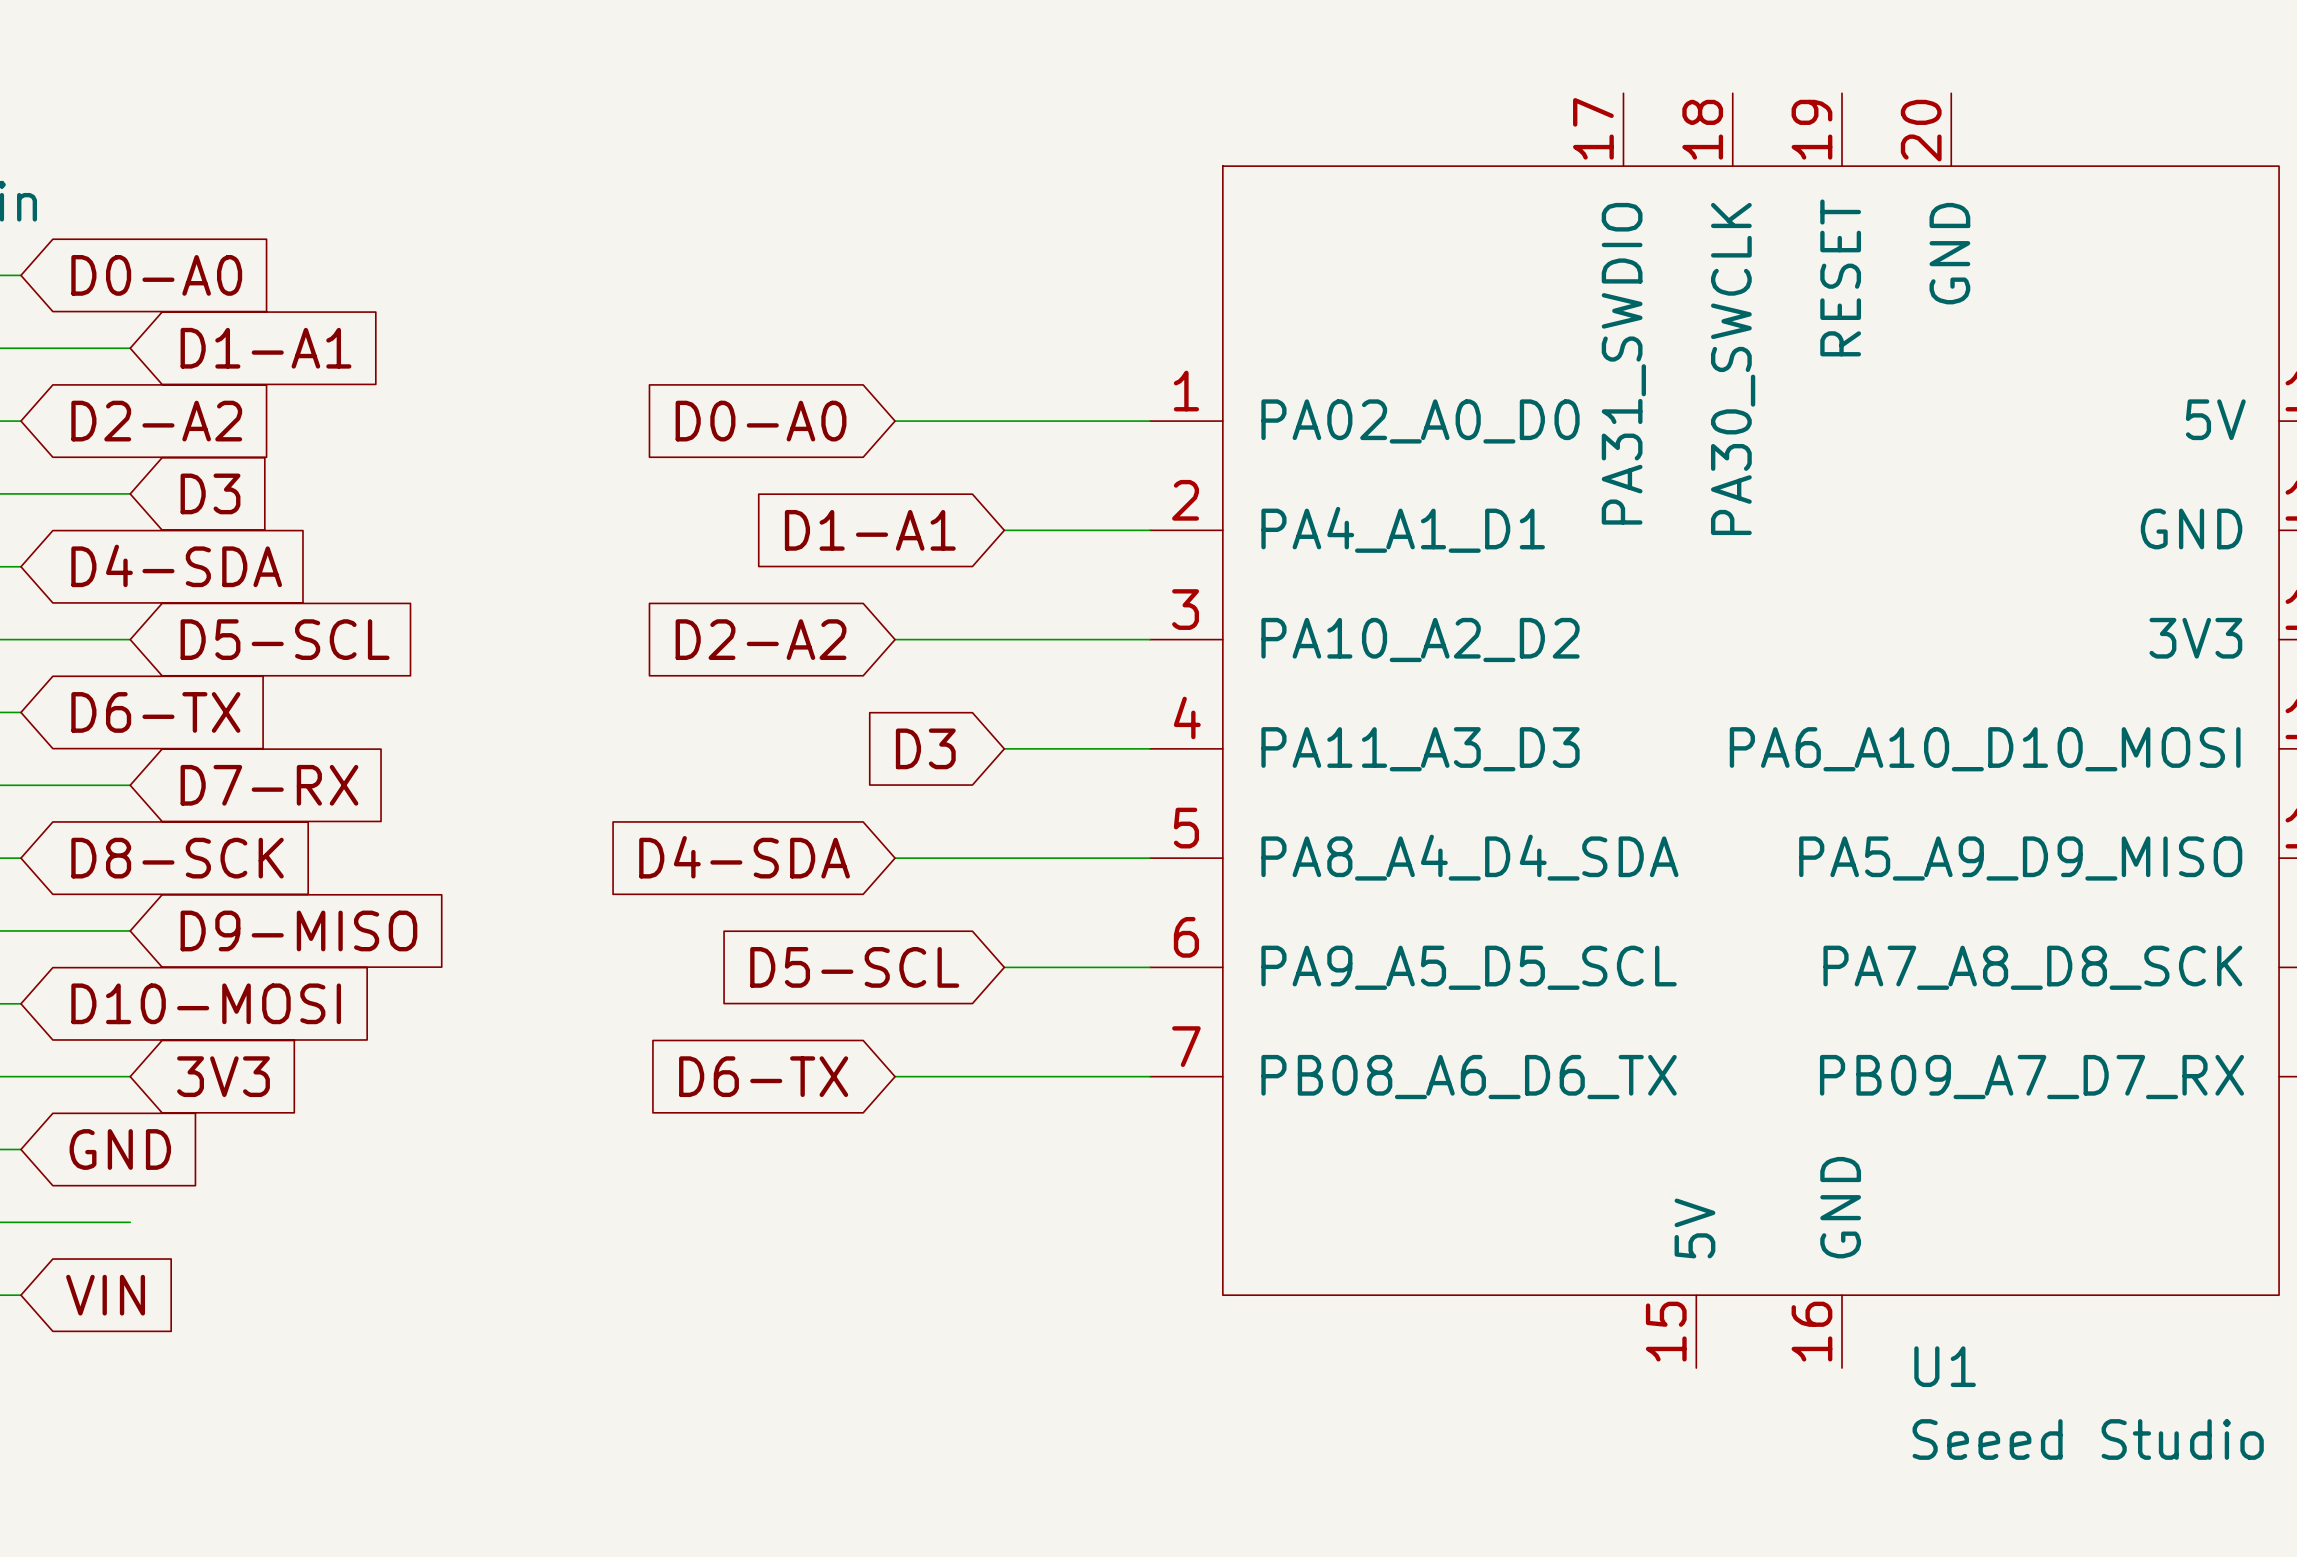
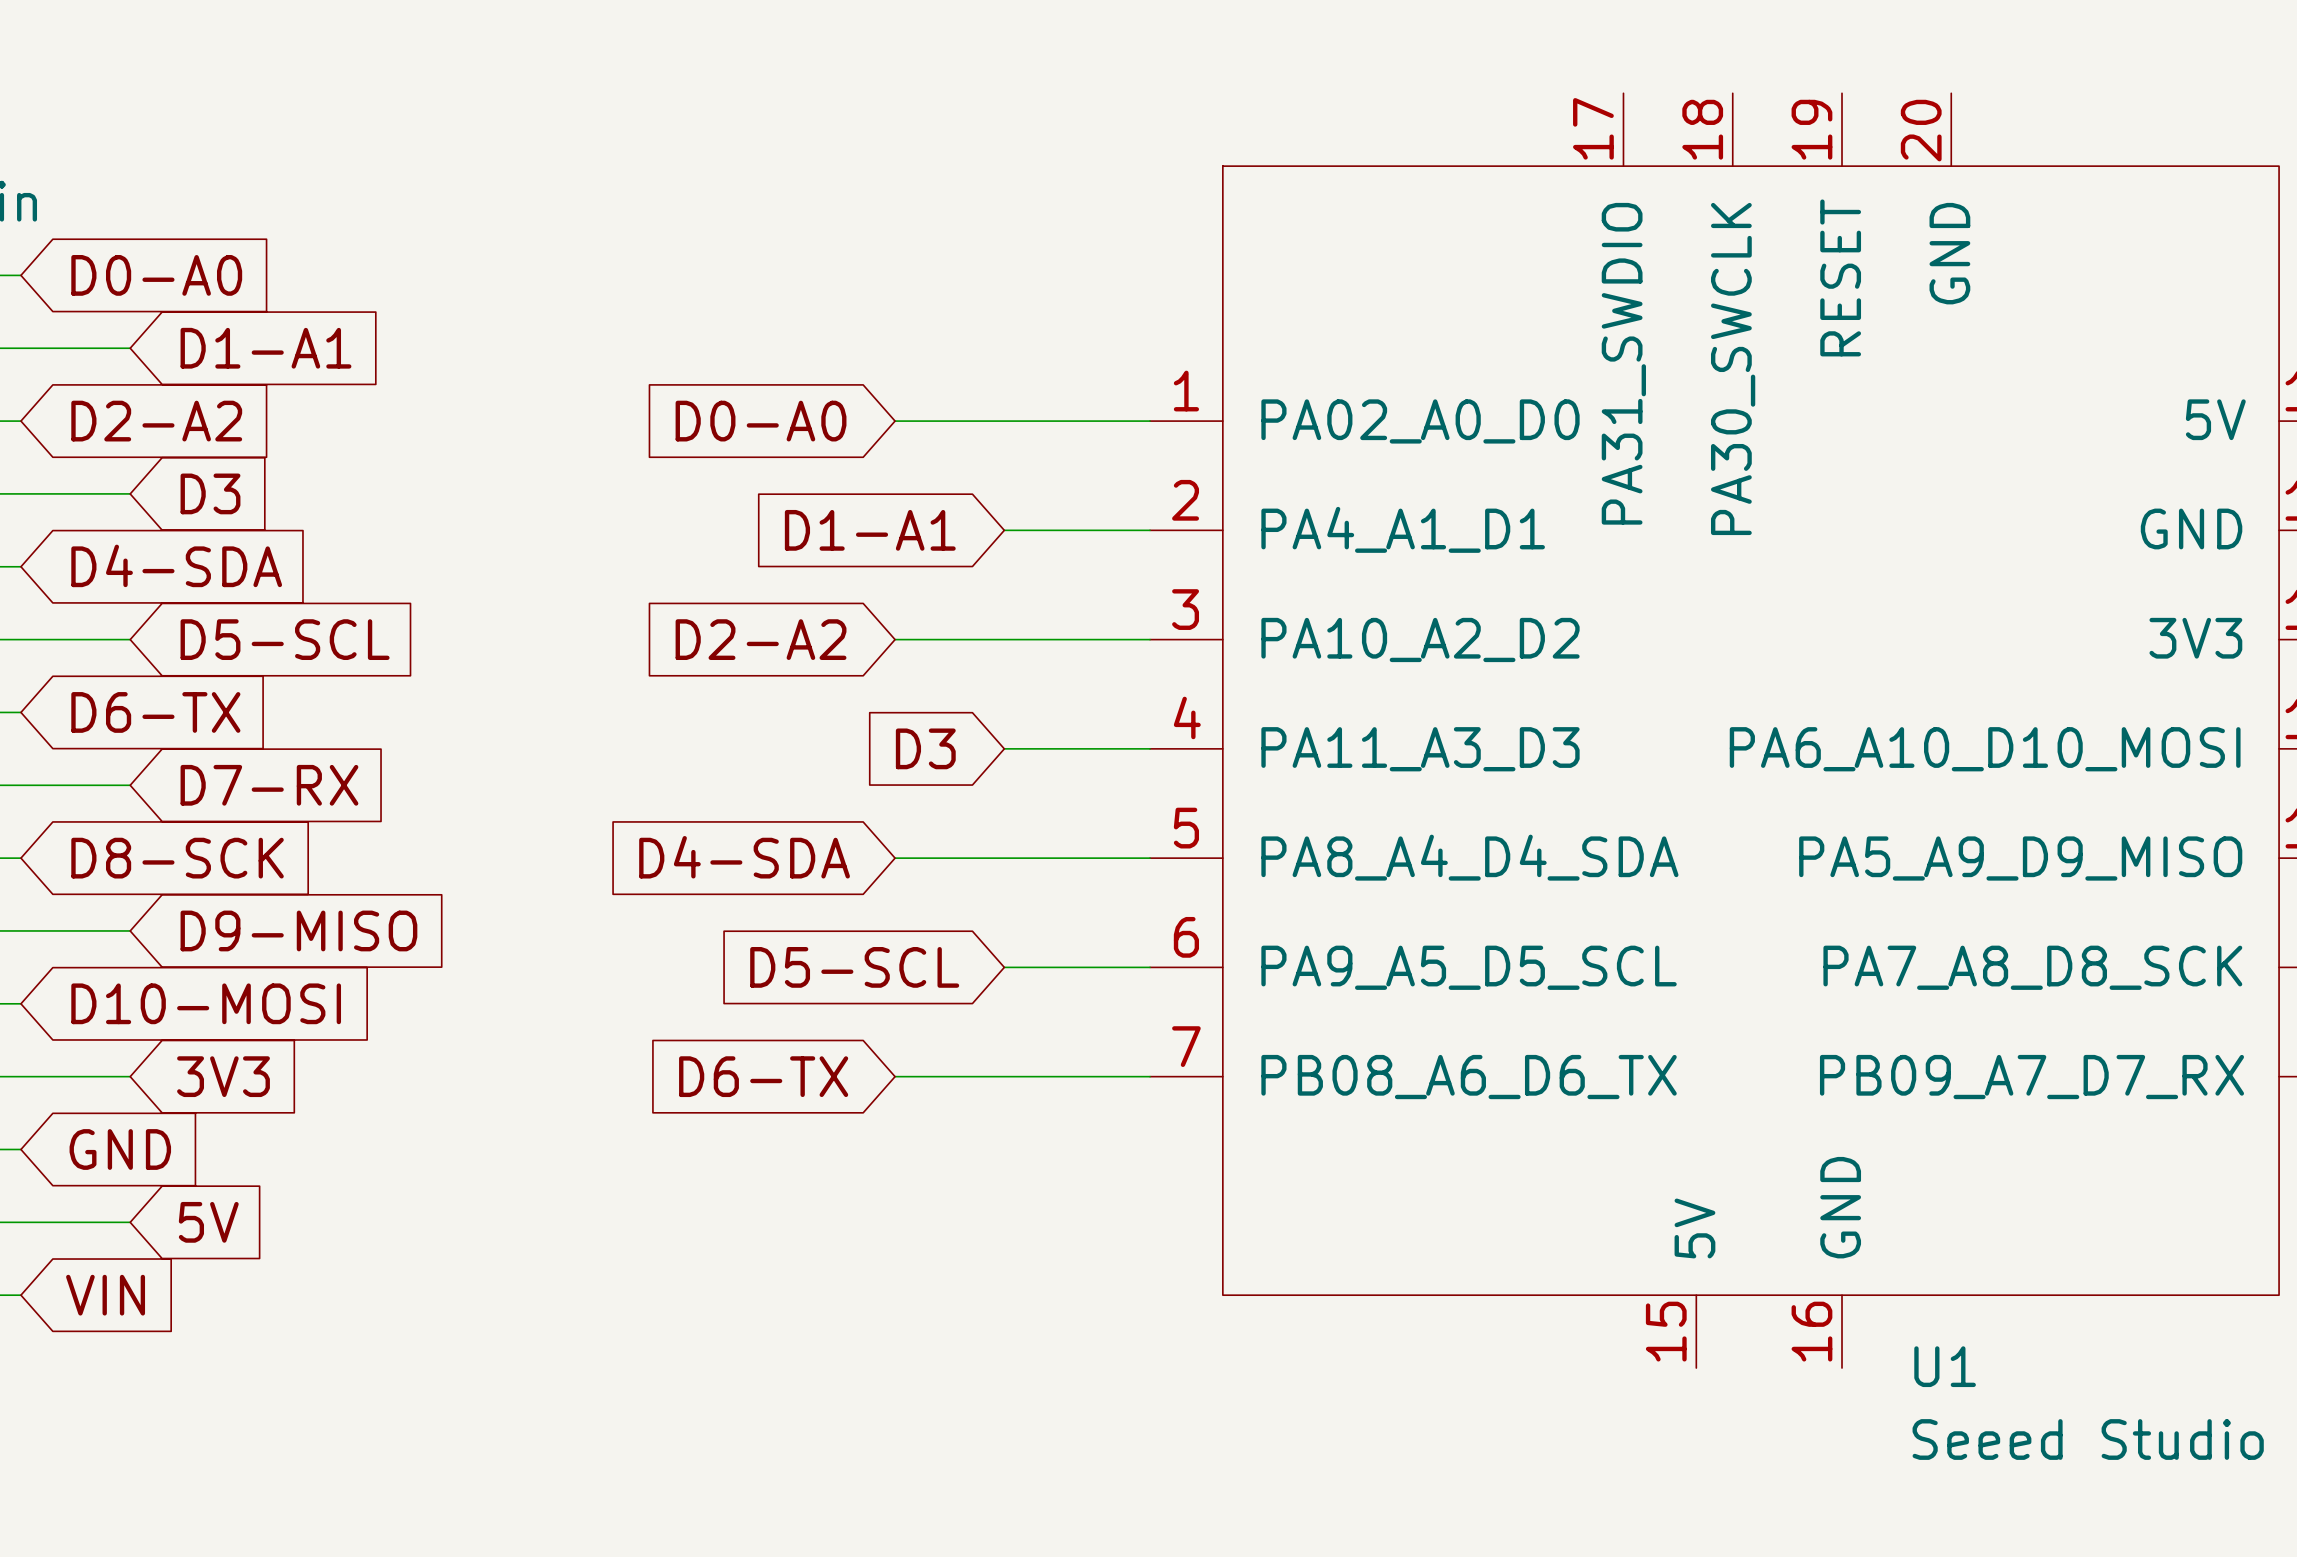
global label: none -> 5V (208, 1222)

